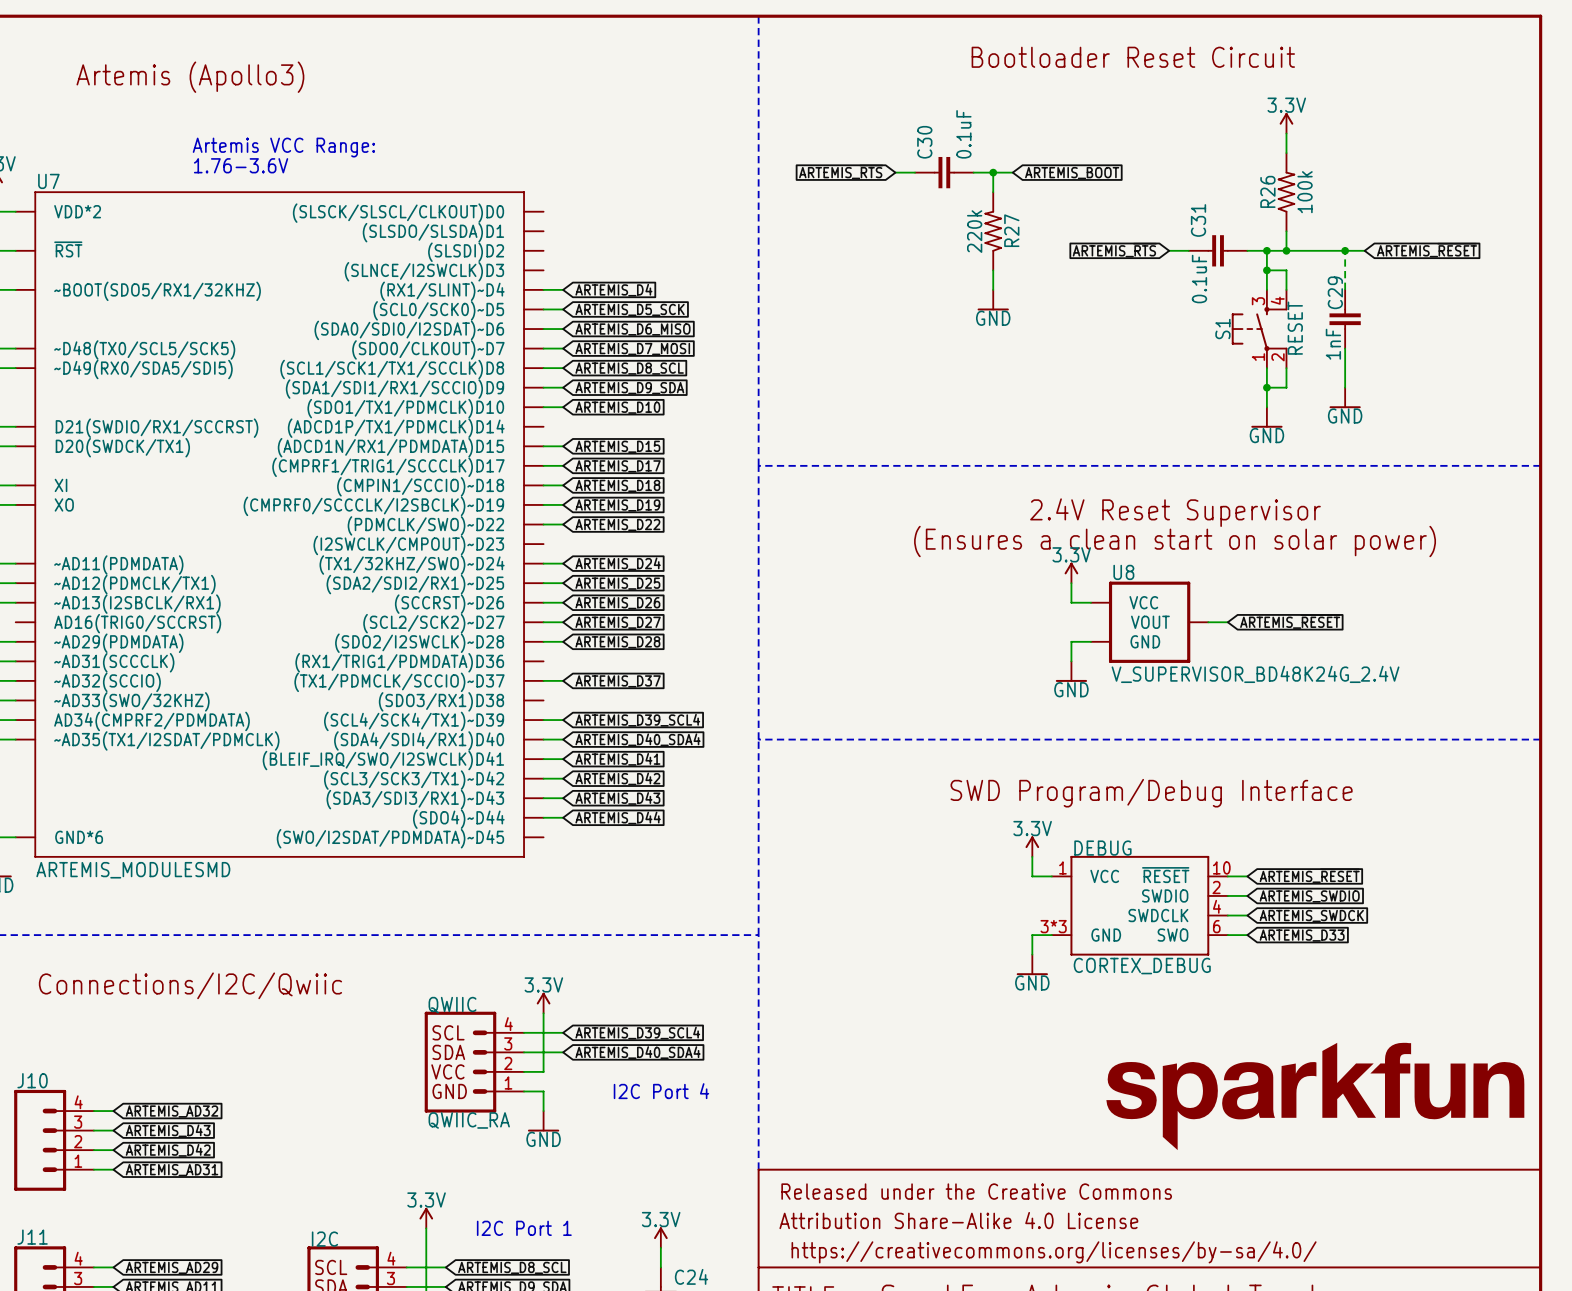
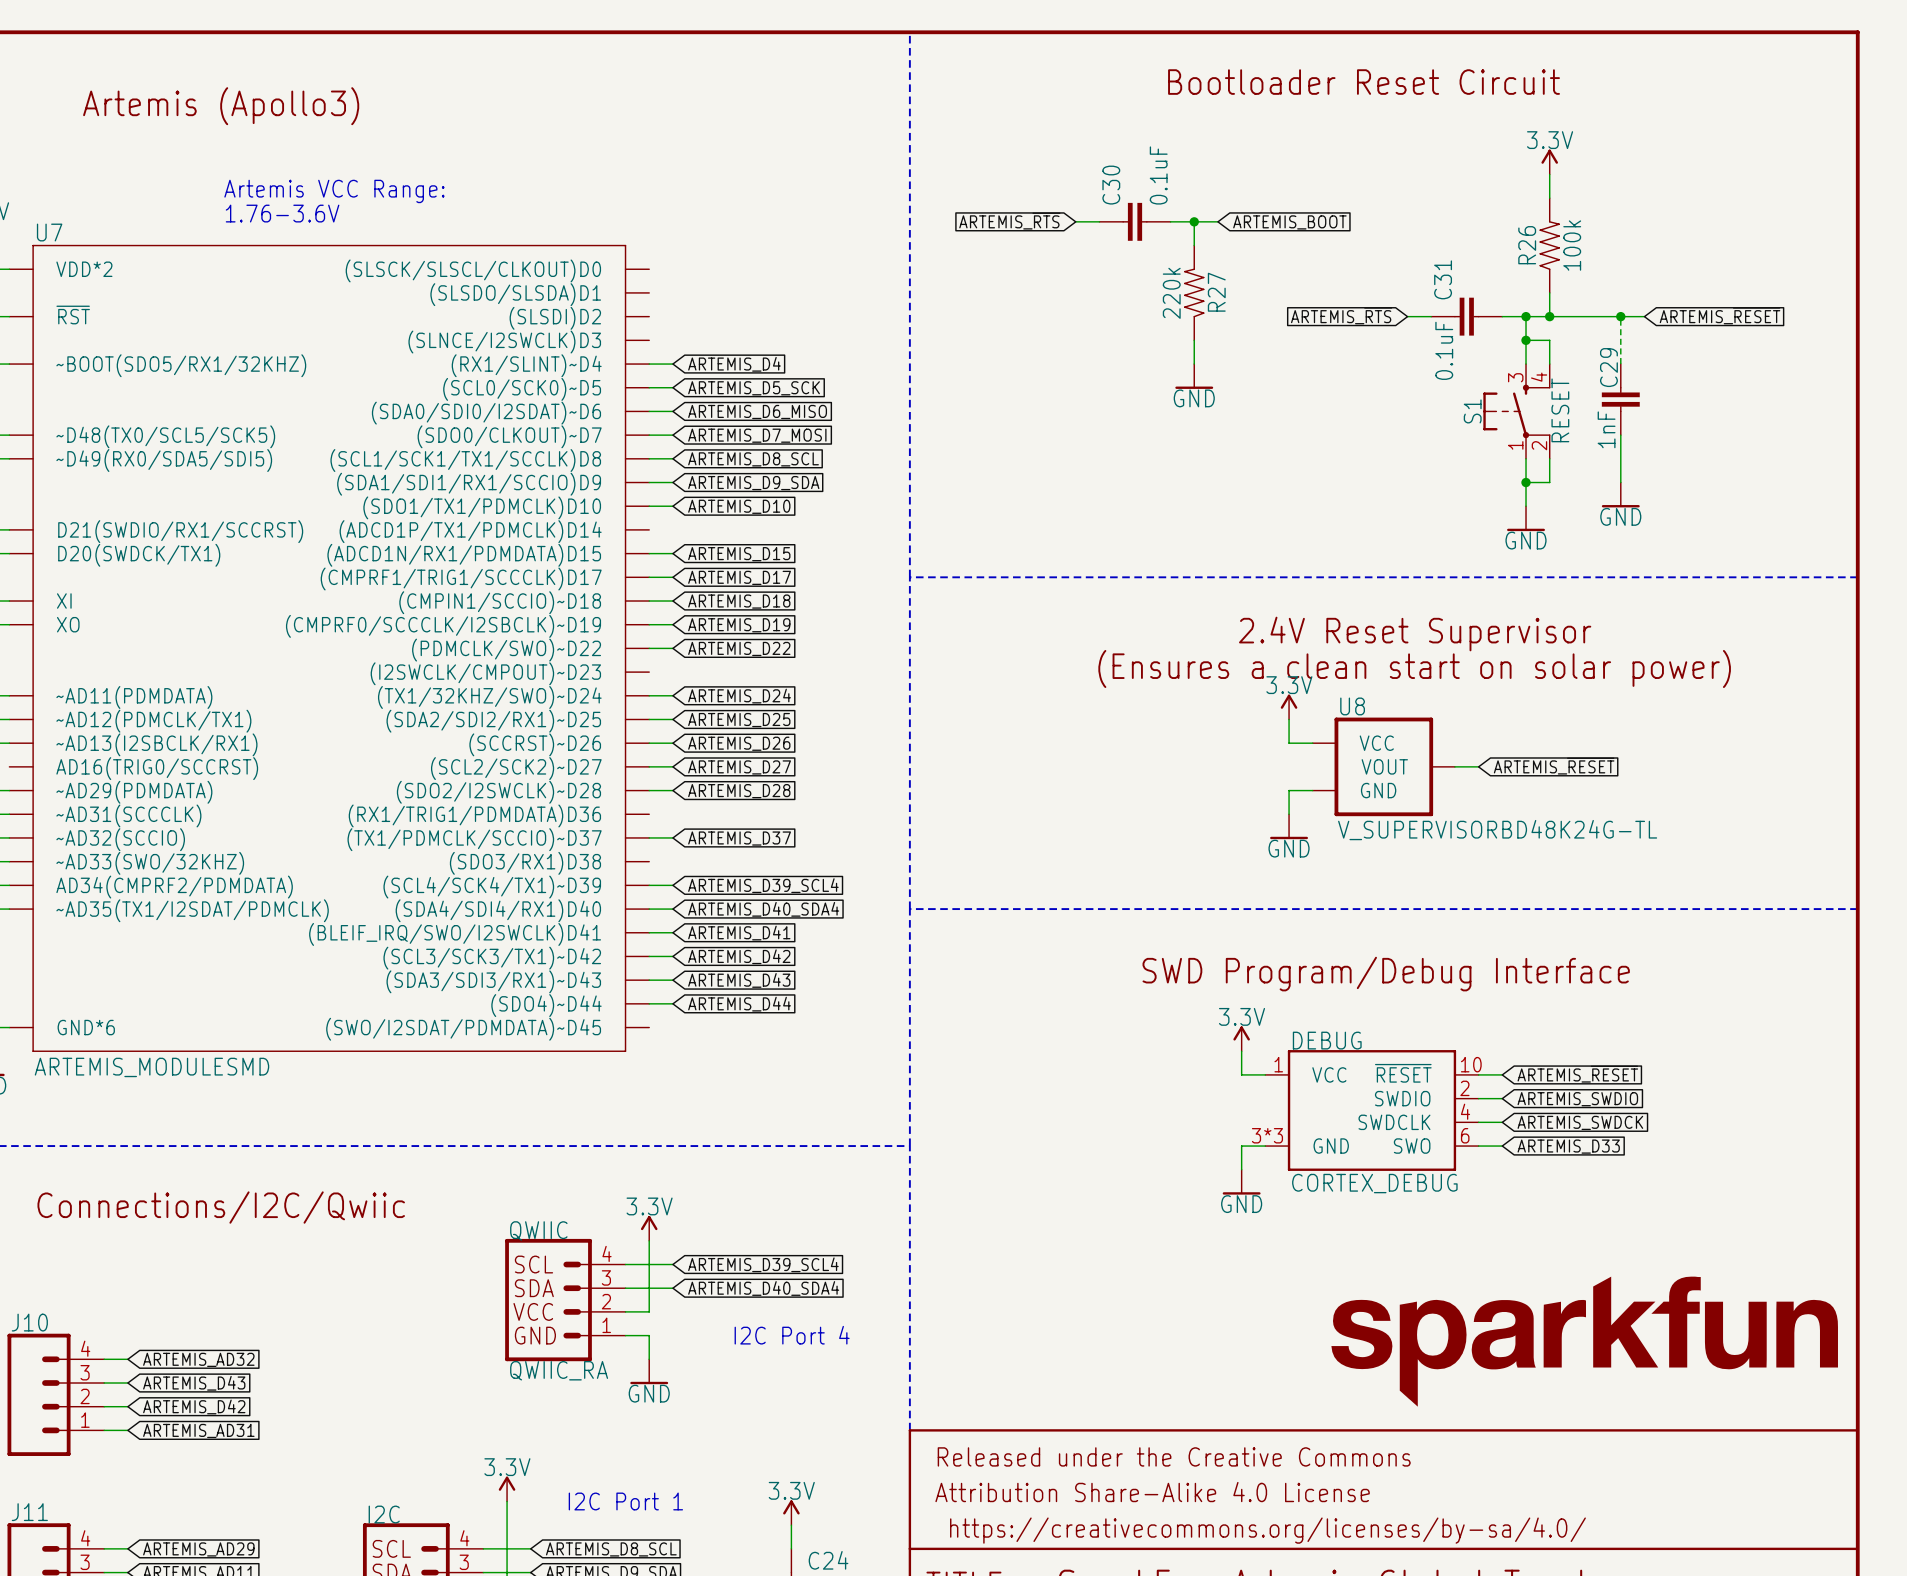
U8 value: V_SUPERVISOR_BD48K24G_2.4V (1255, 674) -> V_SUPERVISORBD48K24G-TL (1497, 830)

